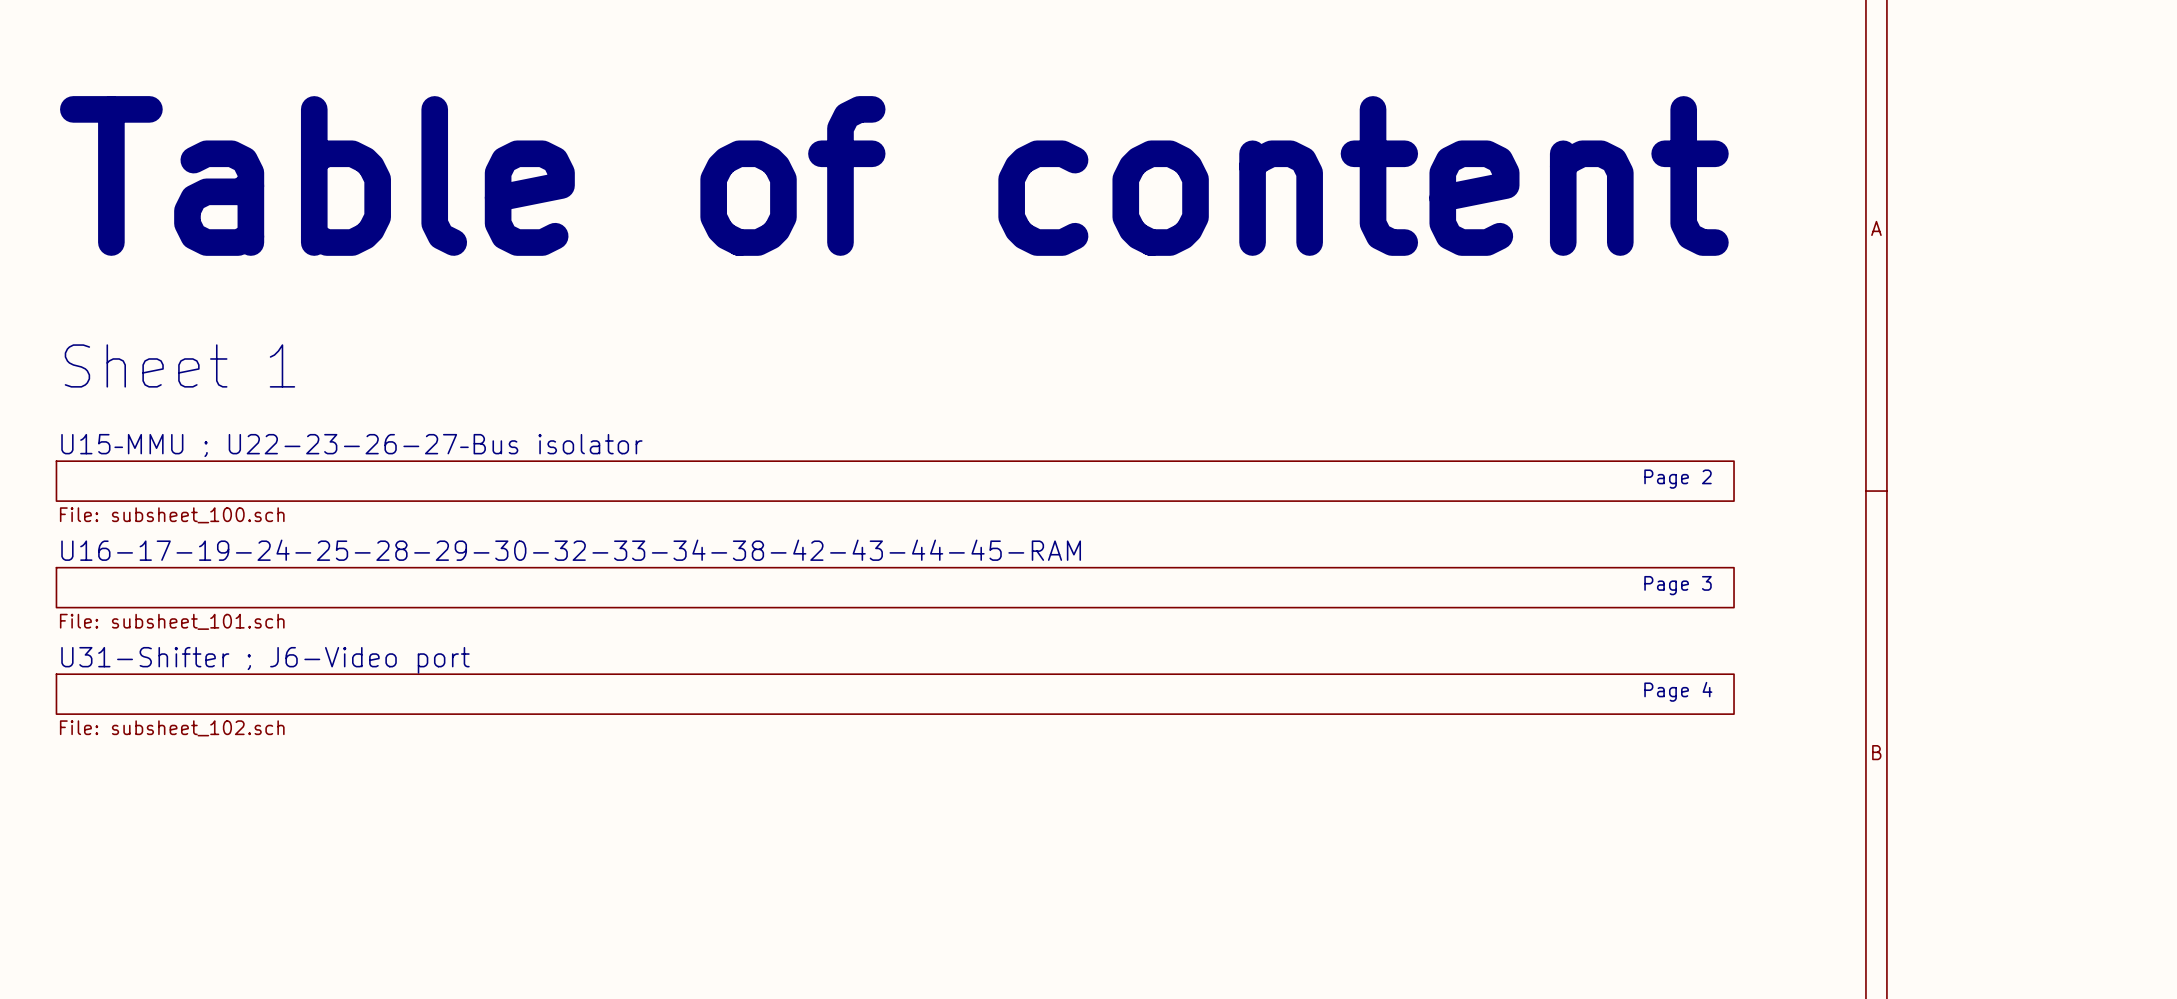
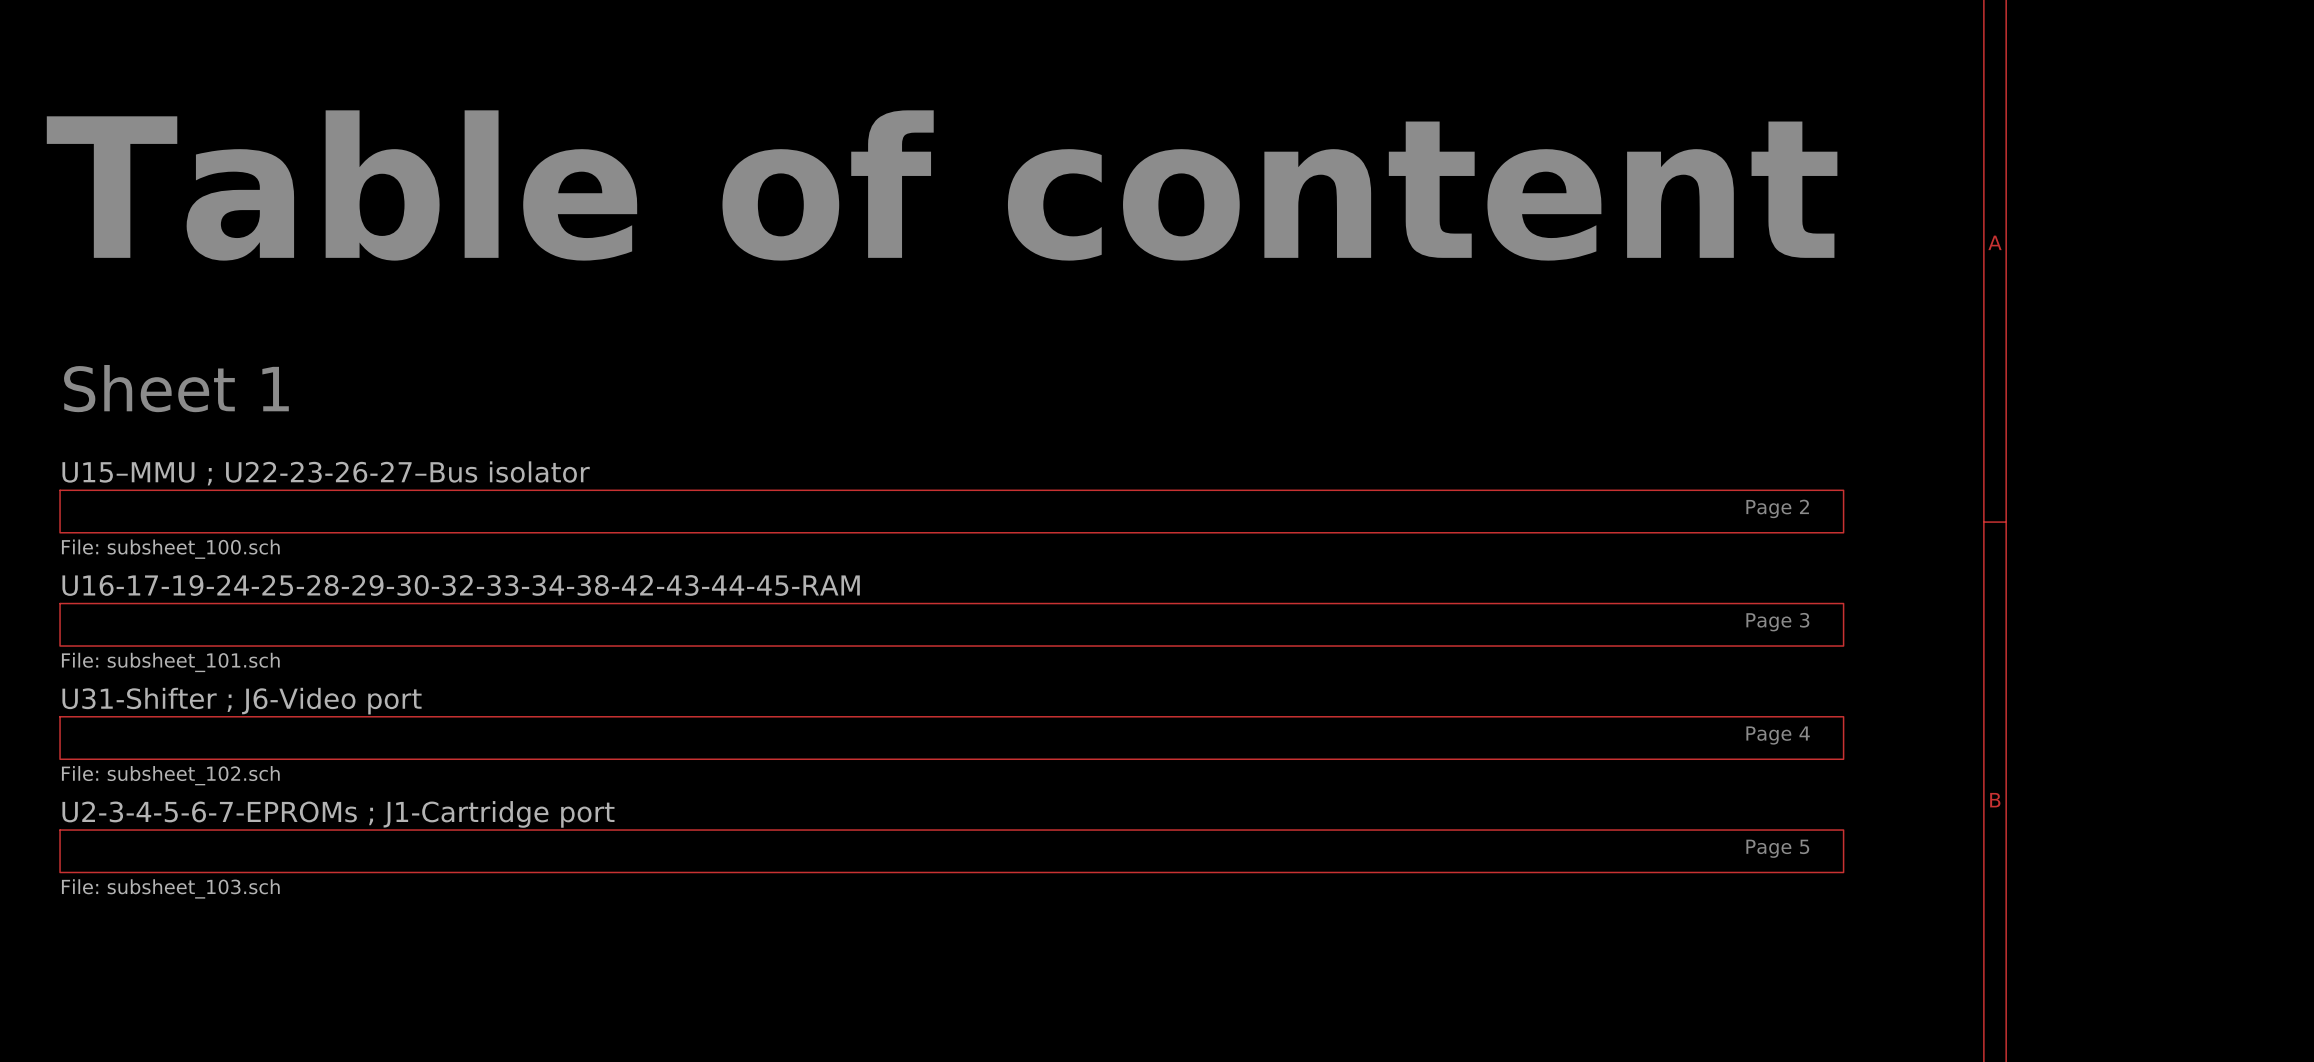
text: none -> Page 5 (1777, 848)
sheet U2-3-4-5-6-7-EPROMs ; J1-Cartridge port: none -> File: subsheet_103.sch (951, 851)

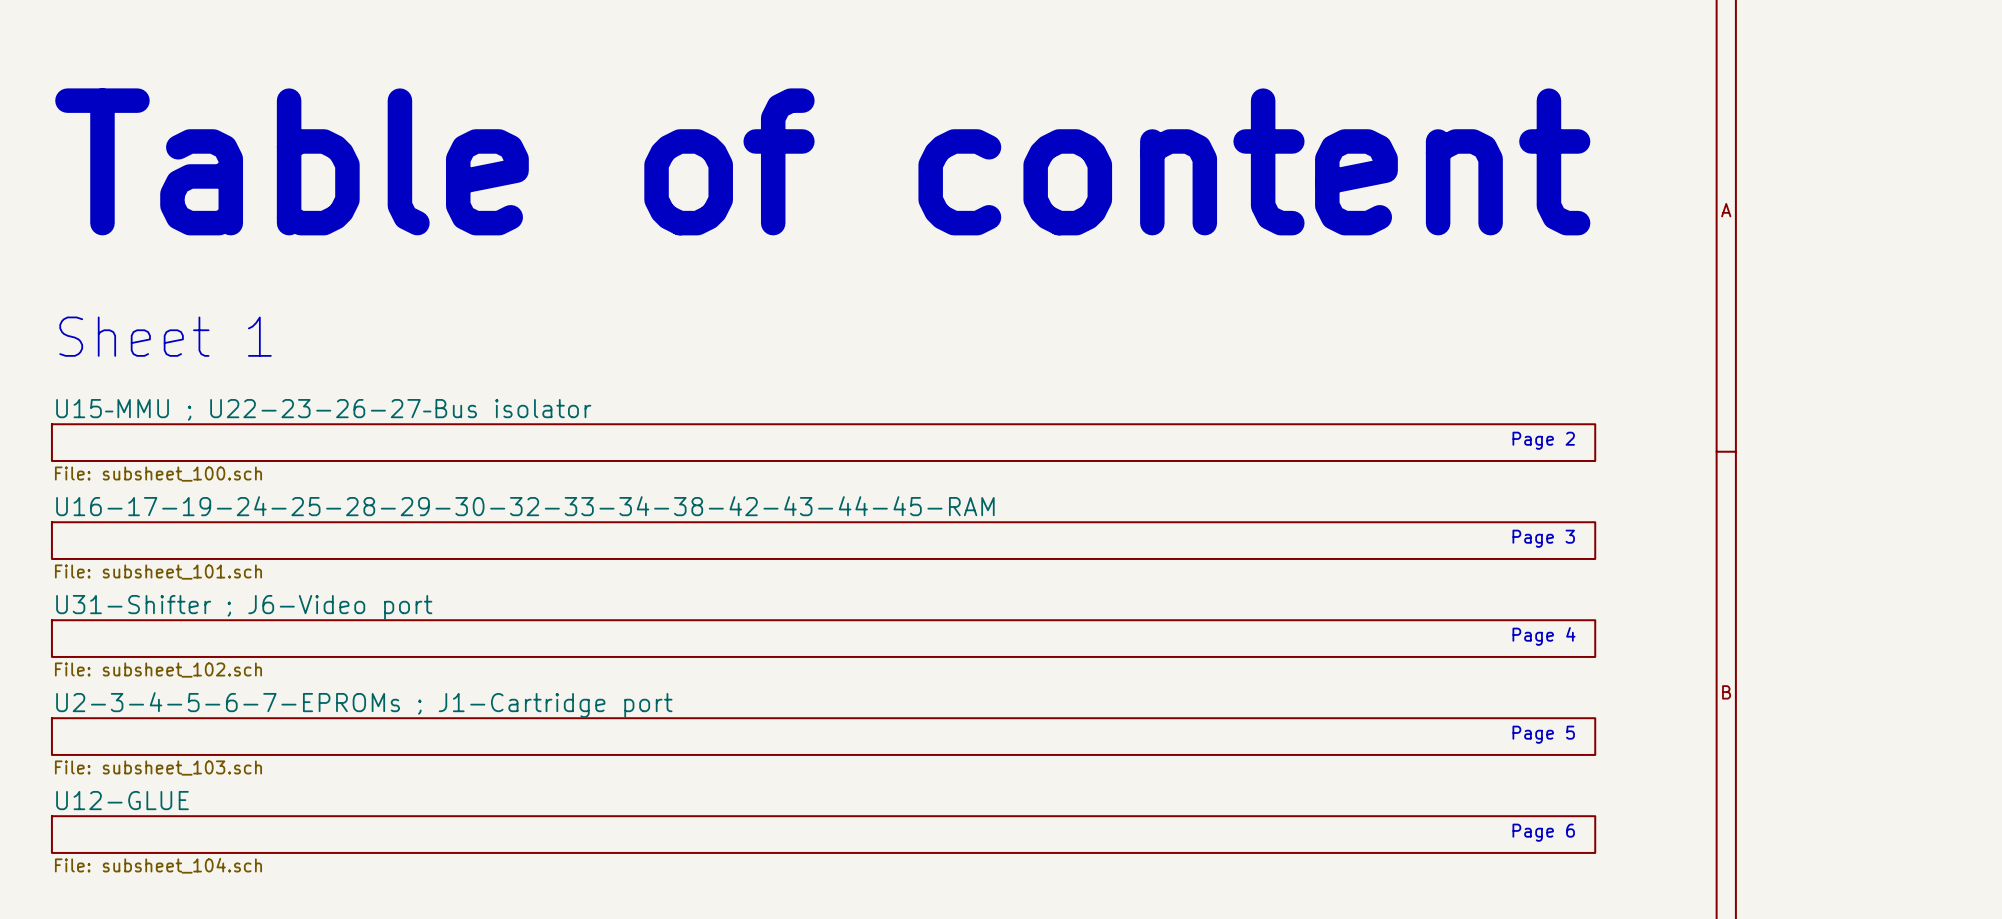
text: none -> Page 6 (1543, 832)
sheet U12-GLUE: none -> File: subsheet_104.sch (823, 834)

